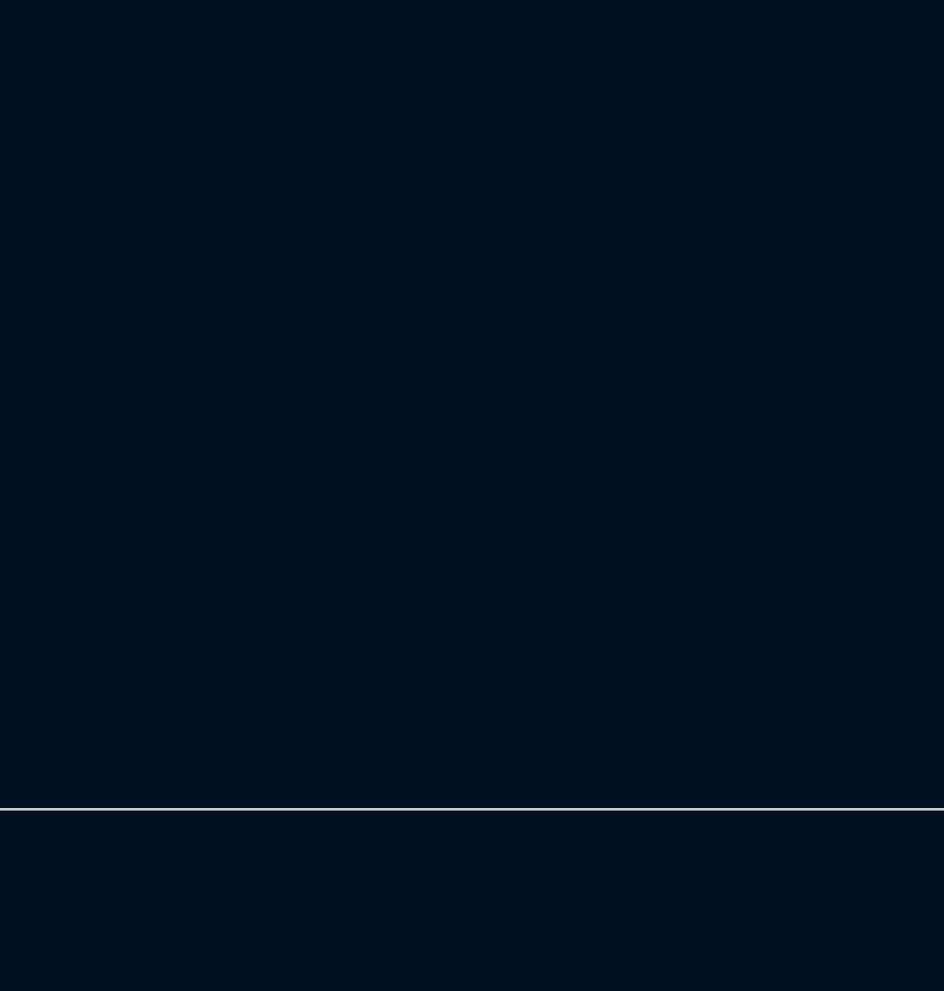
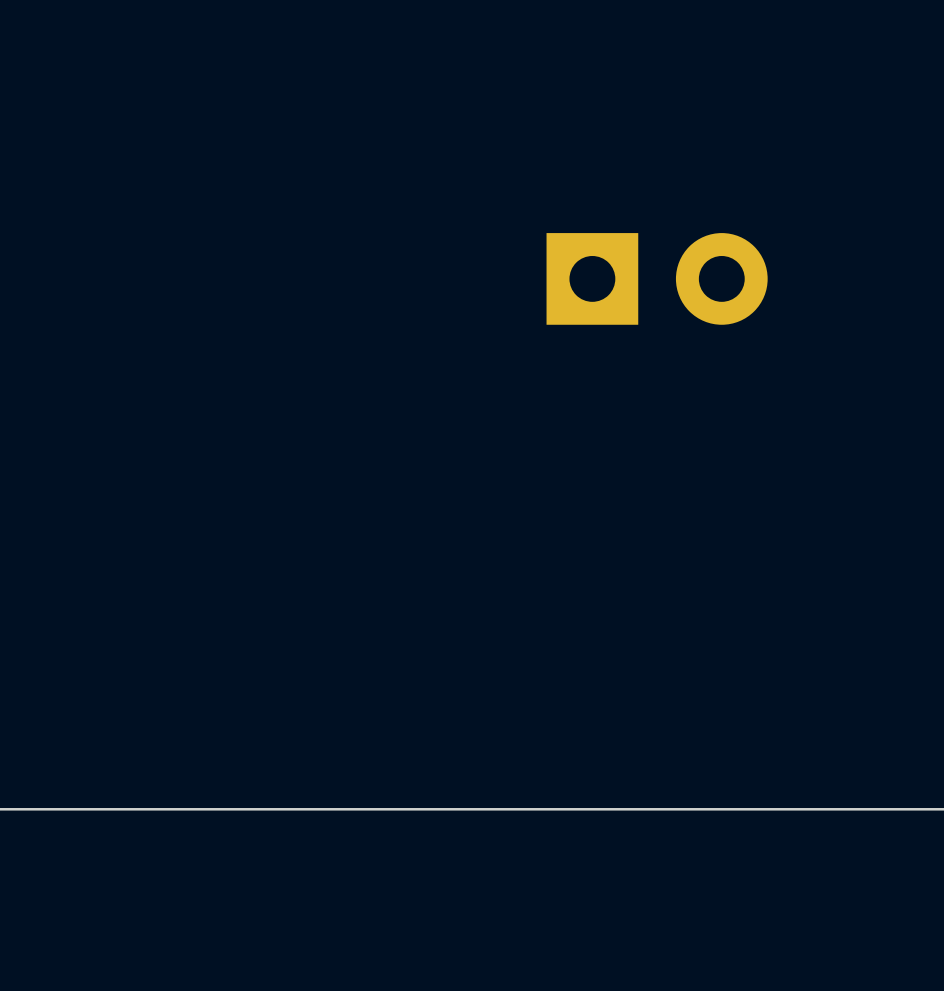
part: none -> (657, 278)

